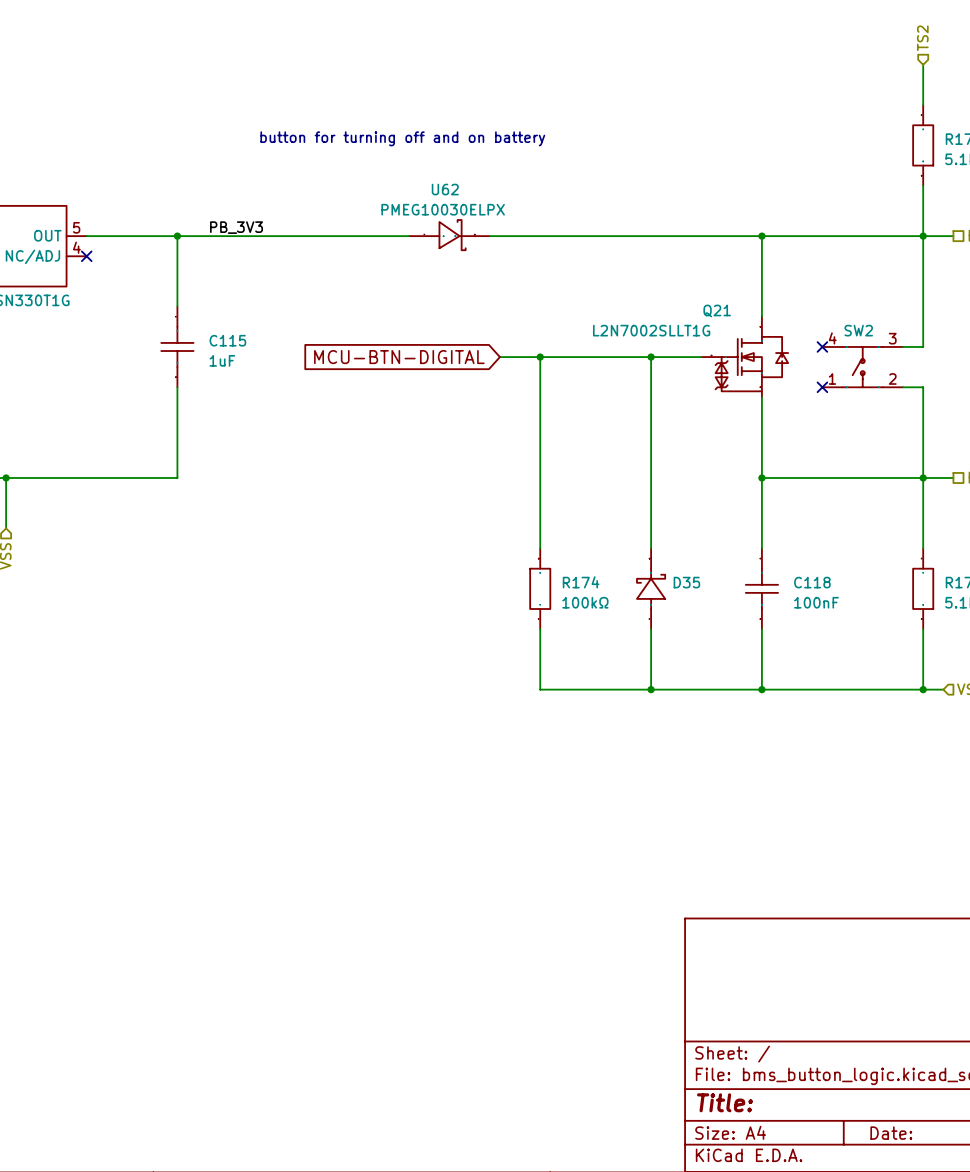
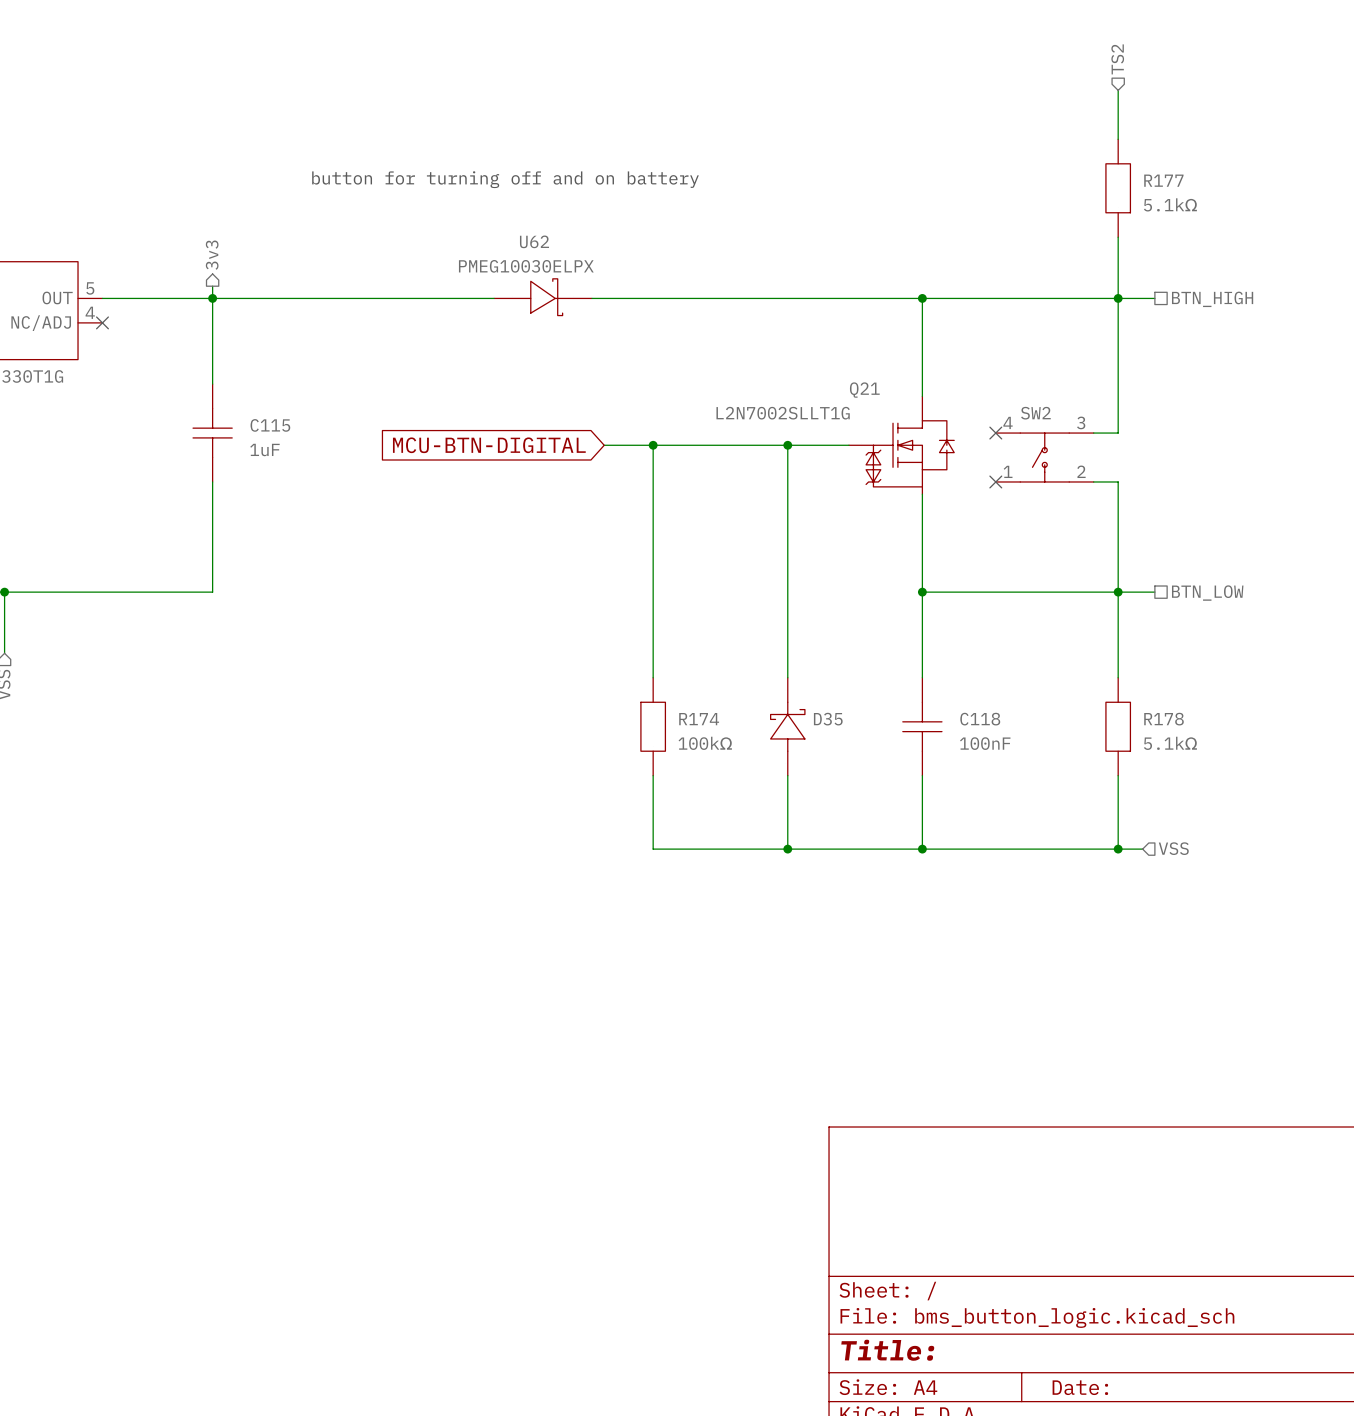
hierarchical label: none -> 3v3 (212, 255)
wire: none -> (212, 286) (212, 298)
label: PB_3V3 (236, 227) -> none

